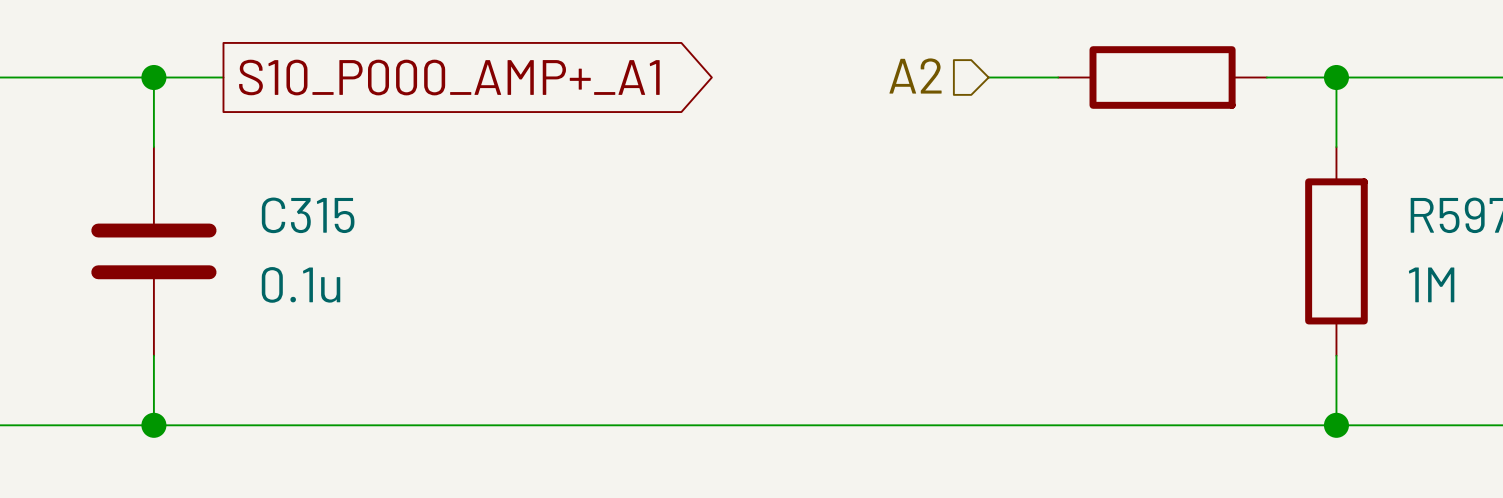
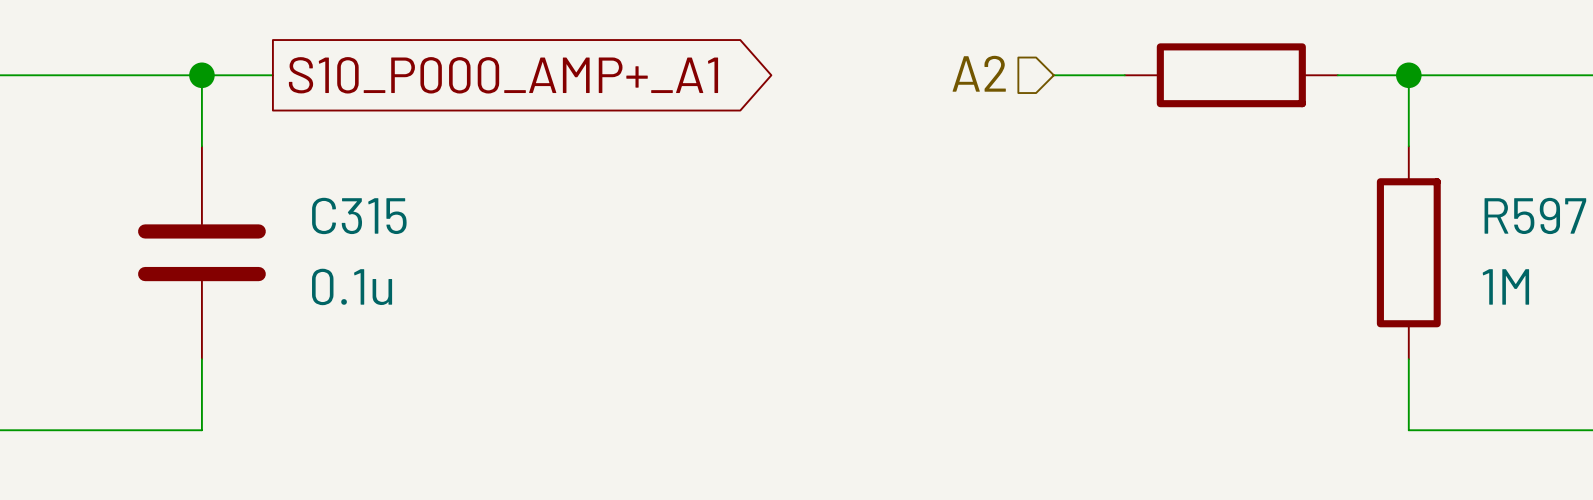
wire: (153, 425) (1336, 425) -> none
junction: (153, 425) -> none
junction: (1336, 425) -> none

